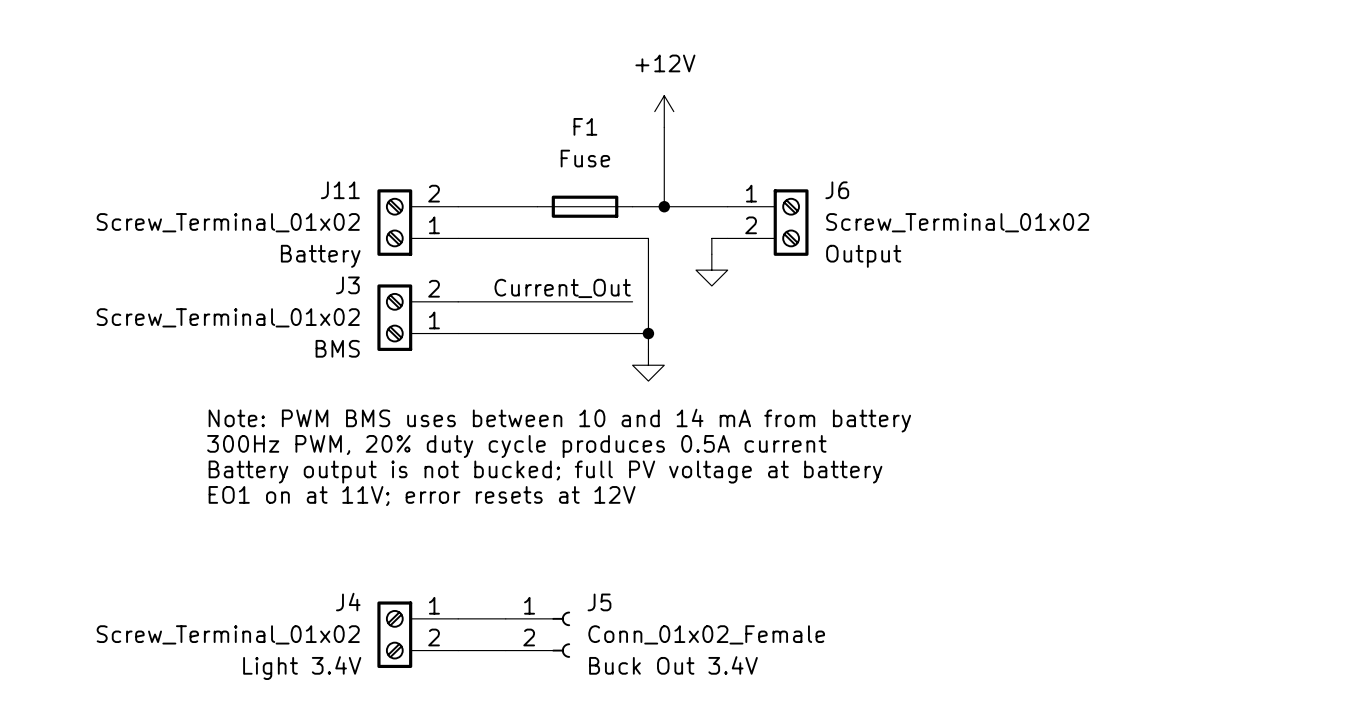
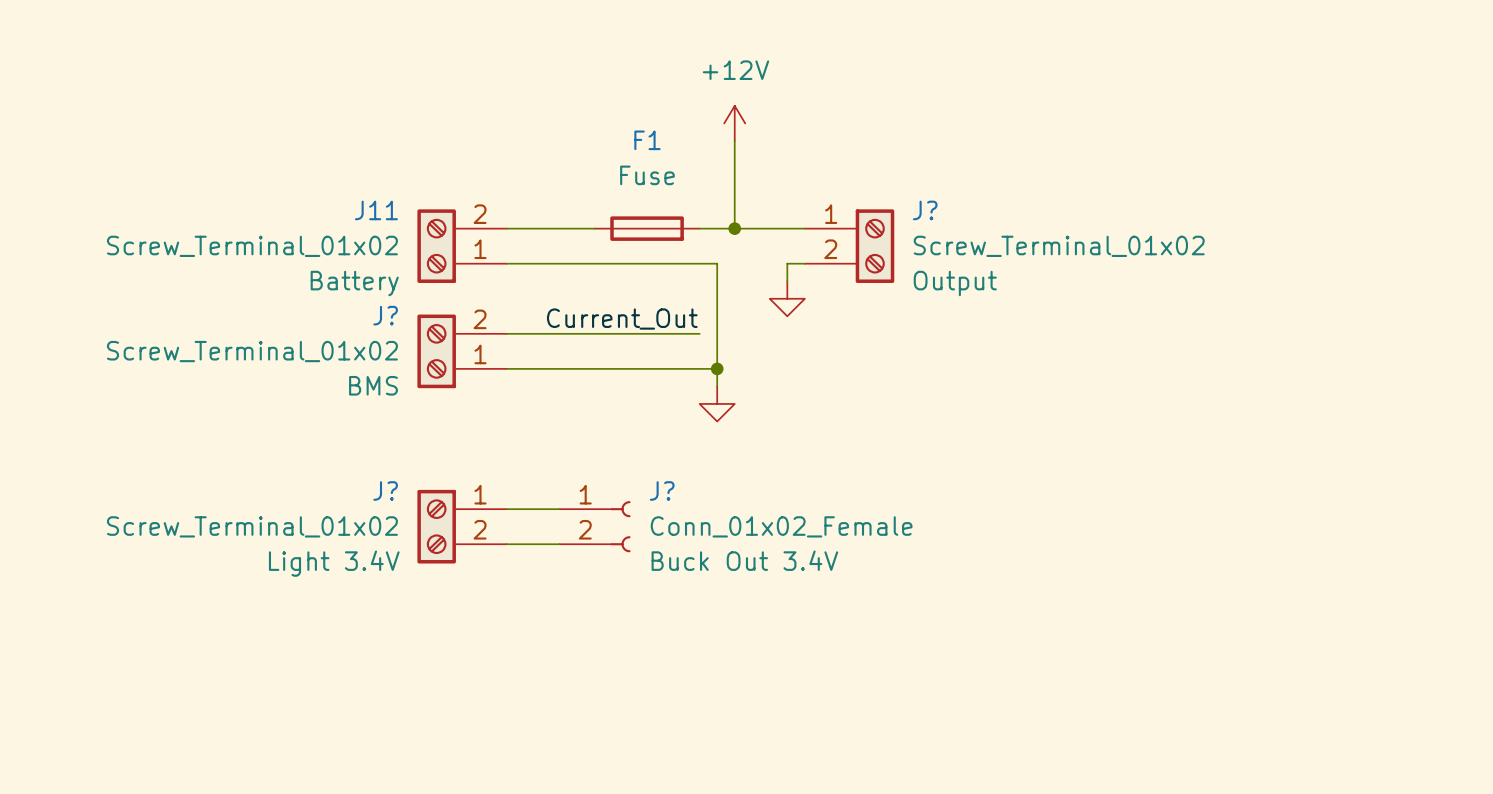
J6 name: J6 (837, 190) -> J? (925, 210)
J3 name: J3 (347, 285) -> J? (385, 315)
text: Note: PWM BMS uses between 10 and 14 mA from battery (559, 420) -> none
text: 300Hz PWM, 20% duty cycle produces 0.5A current (516, 446) -> none
text: Battery output is not bucked; full PV voltage at battery (545, 472) -> none
J?: none -> Screw_Terminal_01x02 (462, 526)
J?: none -> Conn_01x02_Female (594, 526)
text: EO1 on at 11V; error resets at 12V (422, 496) -> none
wire: (458, 618) (505, 618) -> (506, 544) (559, 544)
J4: Screw_Terminal_01x02 (417, 634) -> none
J5: Conn_01x02_Female (537, 634) -> none
wire: (458, 650) (505, 650) -> (506, 509) (559, 509)

